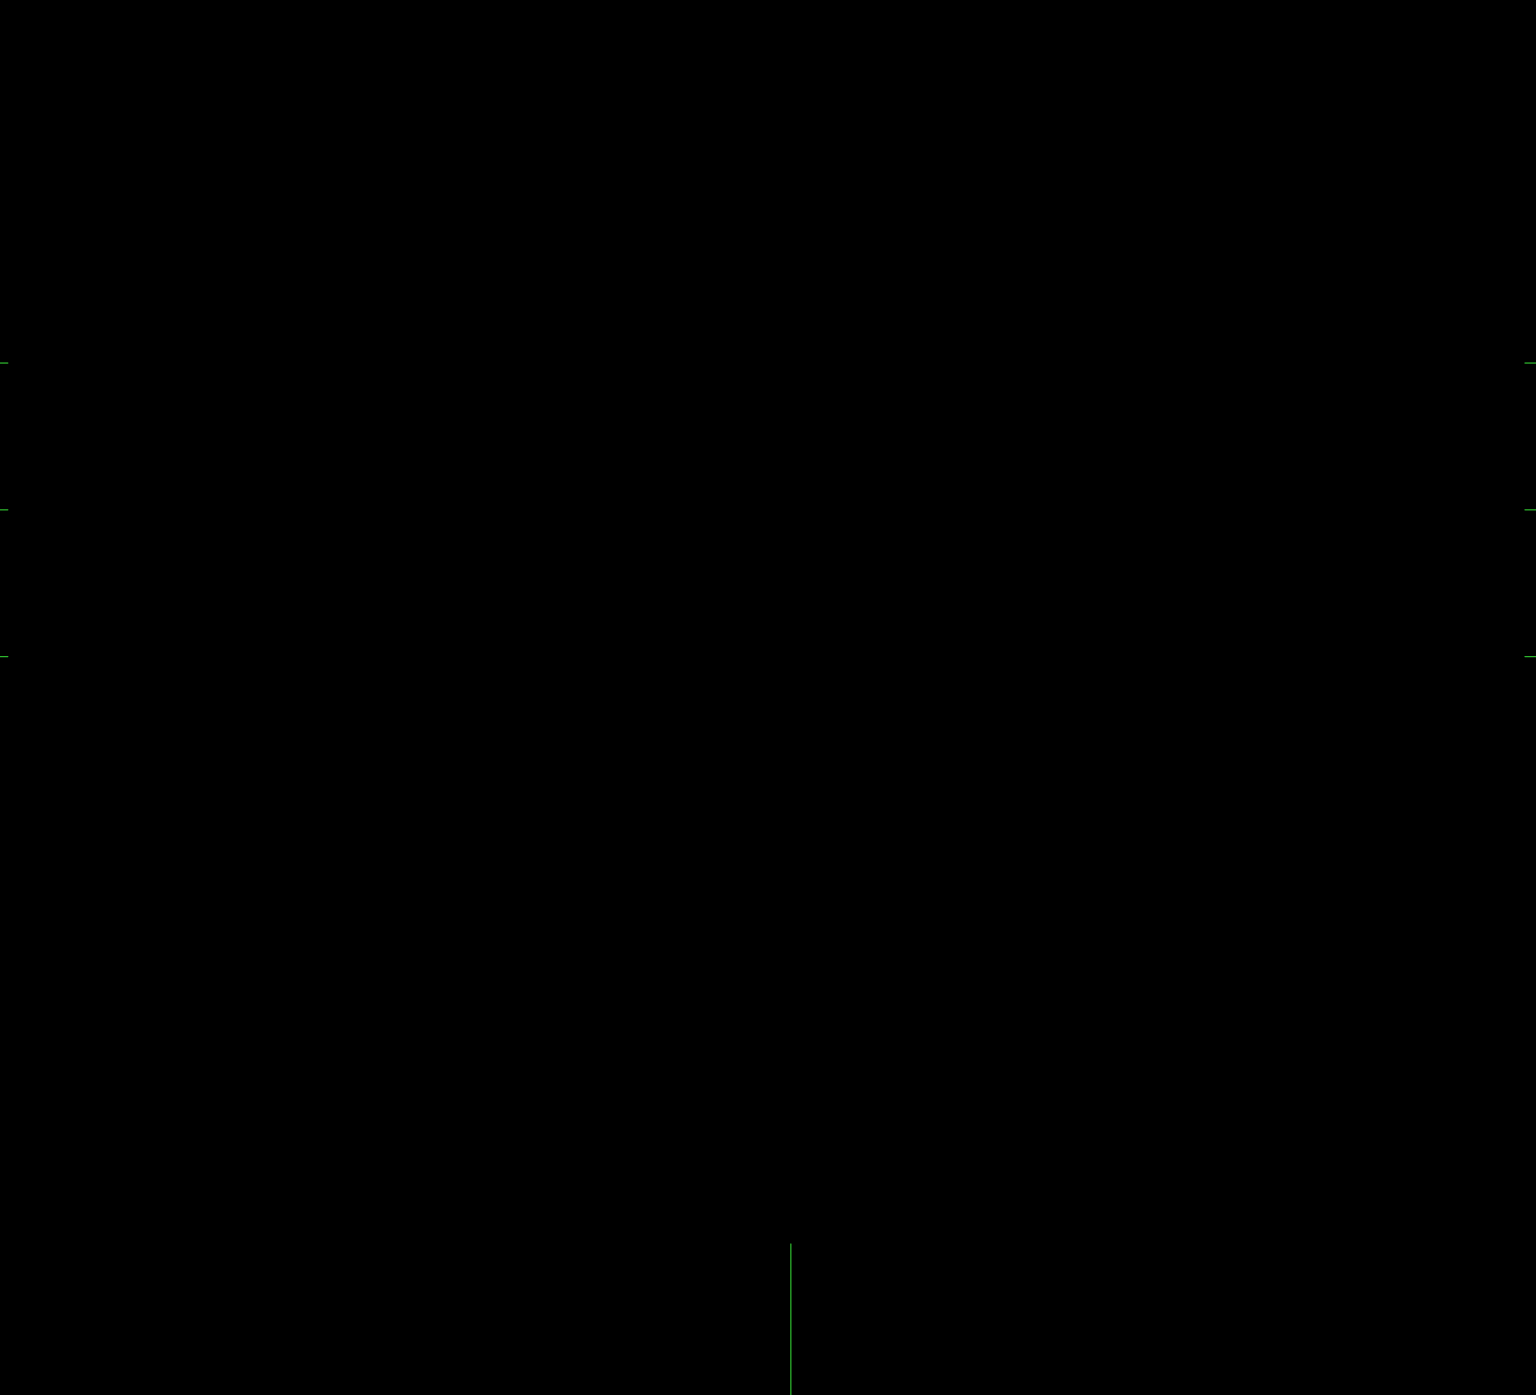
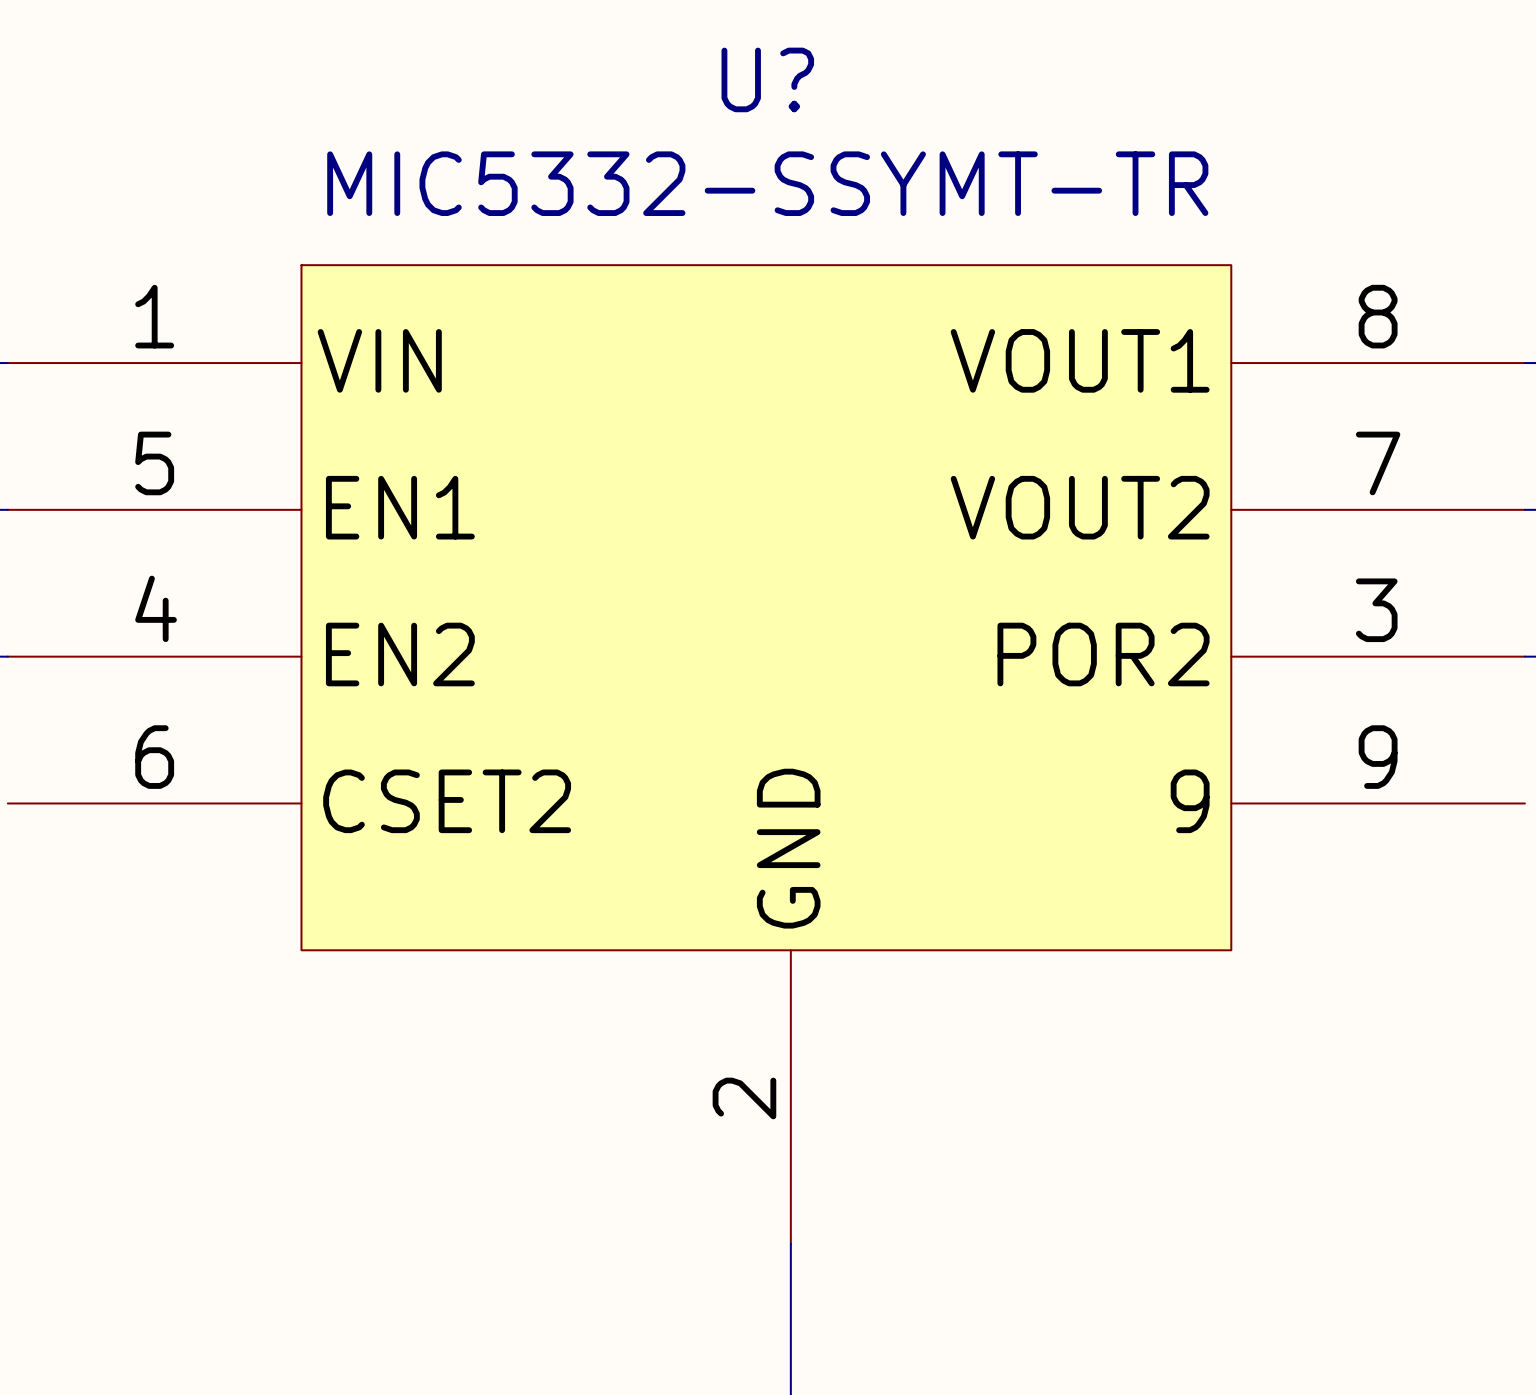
U?: none -> MIC5332-SSYMT-TR (766, 754)

